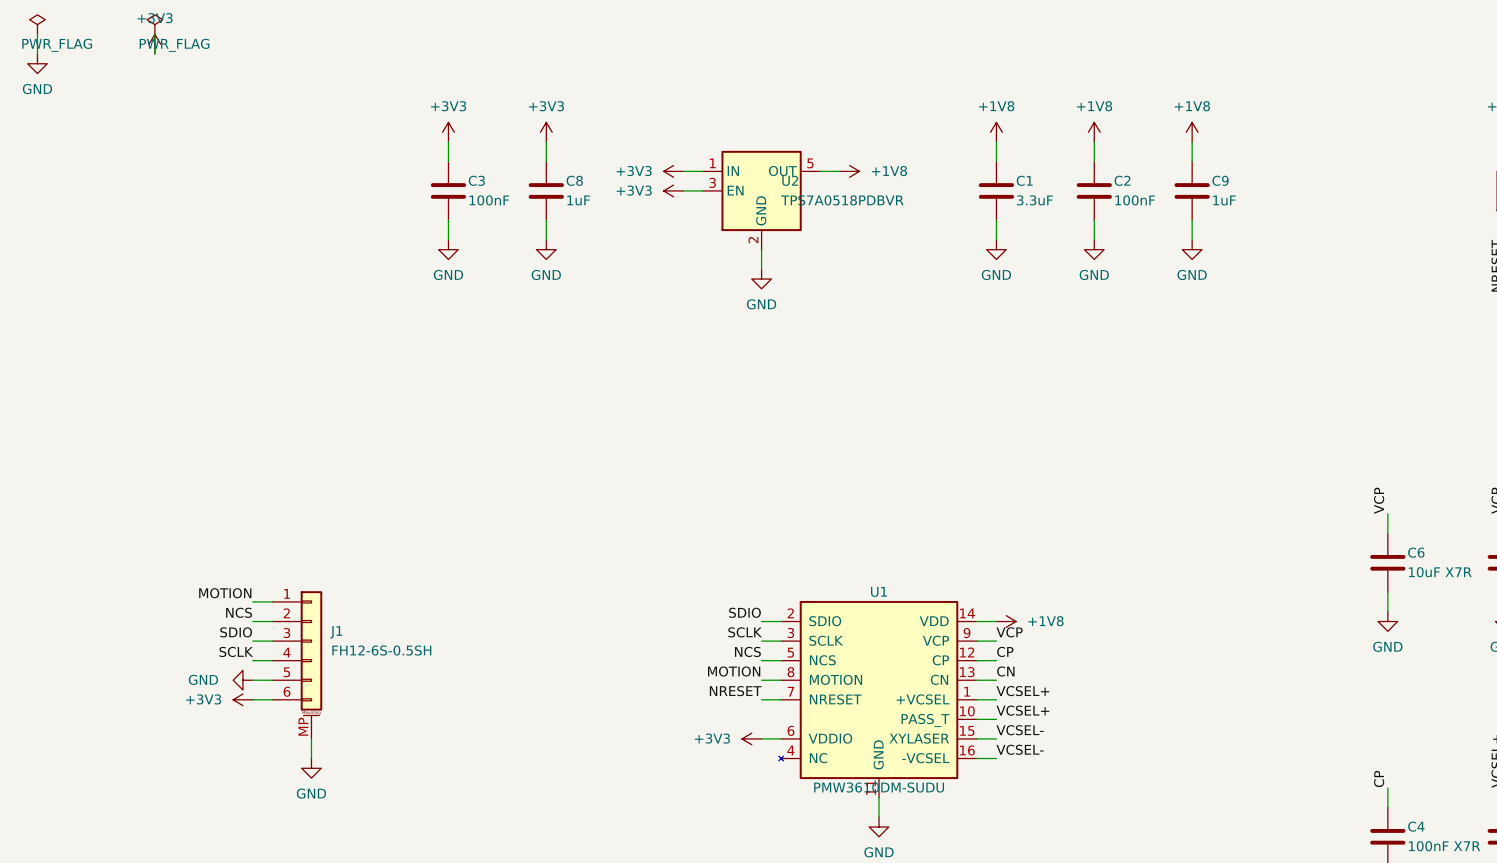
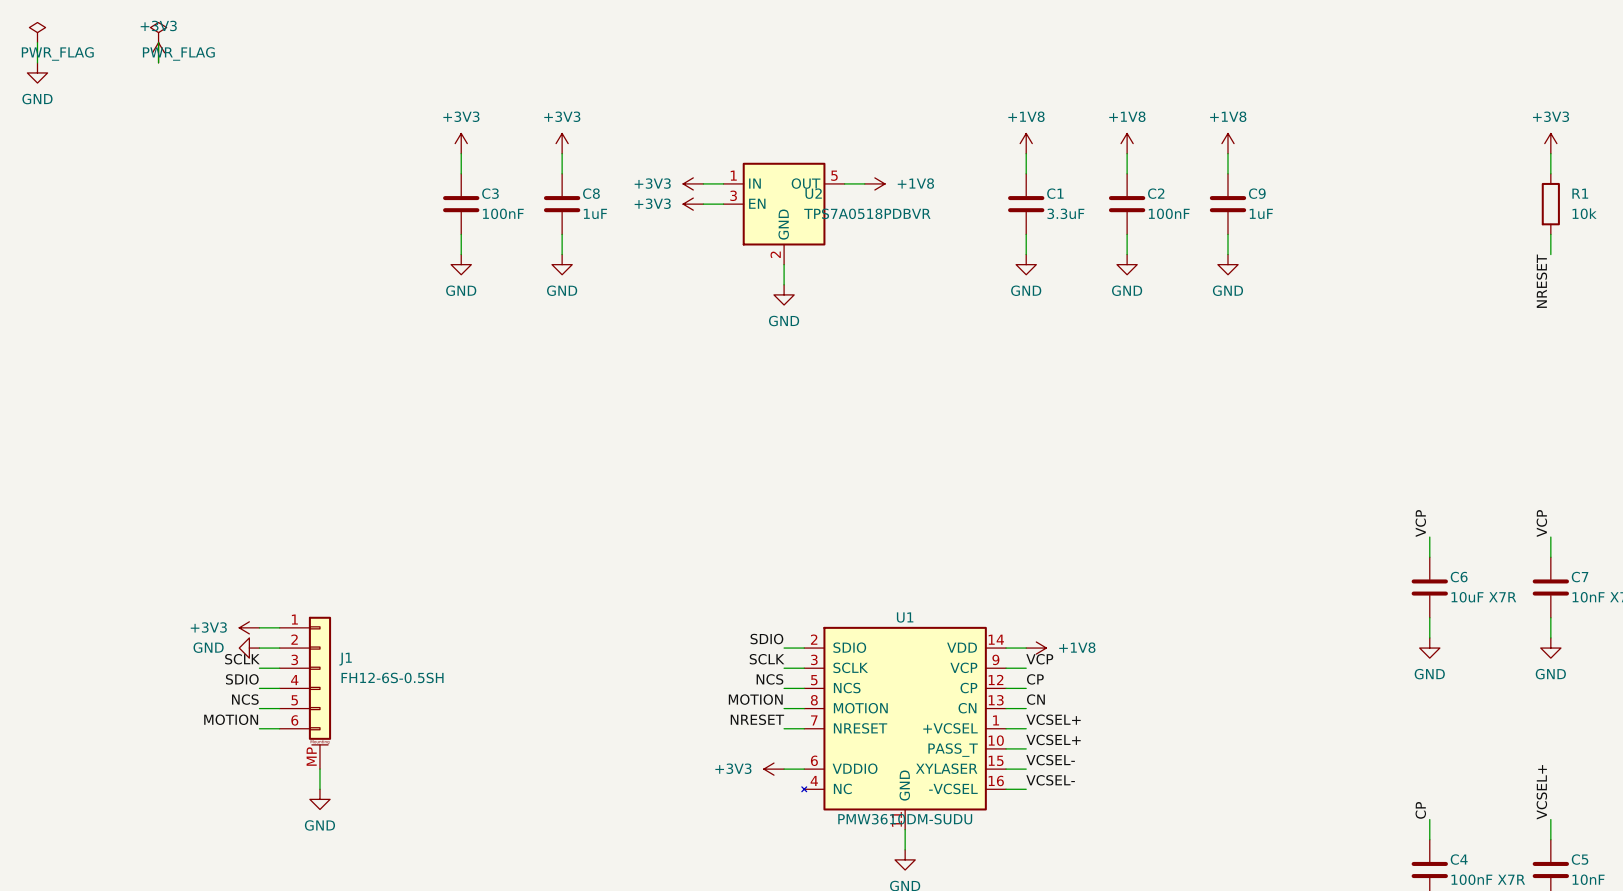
label position: MOTION (225, 593) -> MOTION (231, 719)
label position: NCS (239, 612) -> NCS (245, 699)
label: SDIO (236, 632) -> SCLK (242, 659)
label: SCLK (236, 651) -> SDIO (242, 679)
power symbol position: GND (242, 680) -> GND (249, 648)
power symbol position: +3V3 (242, 699) -> +3V3 (249, 627)

